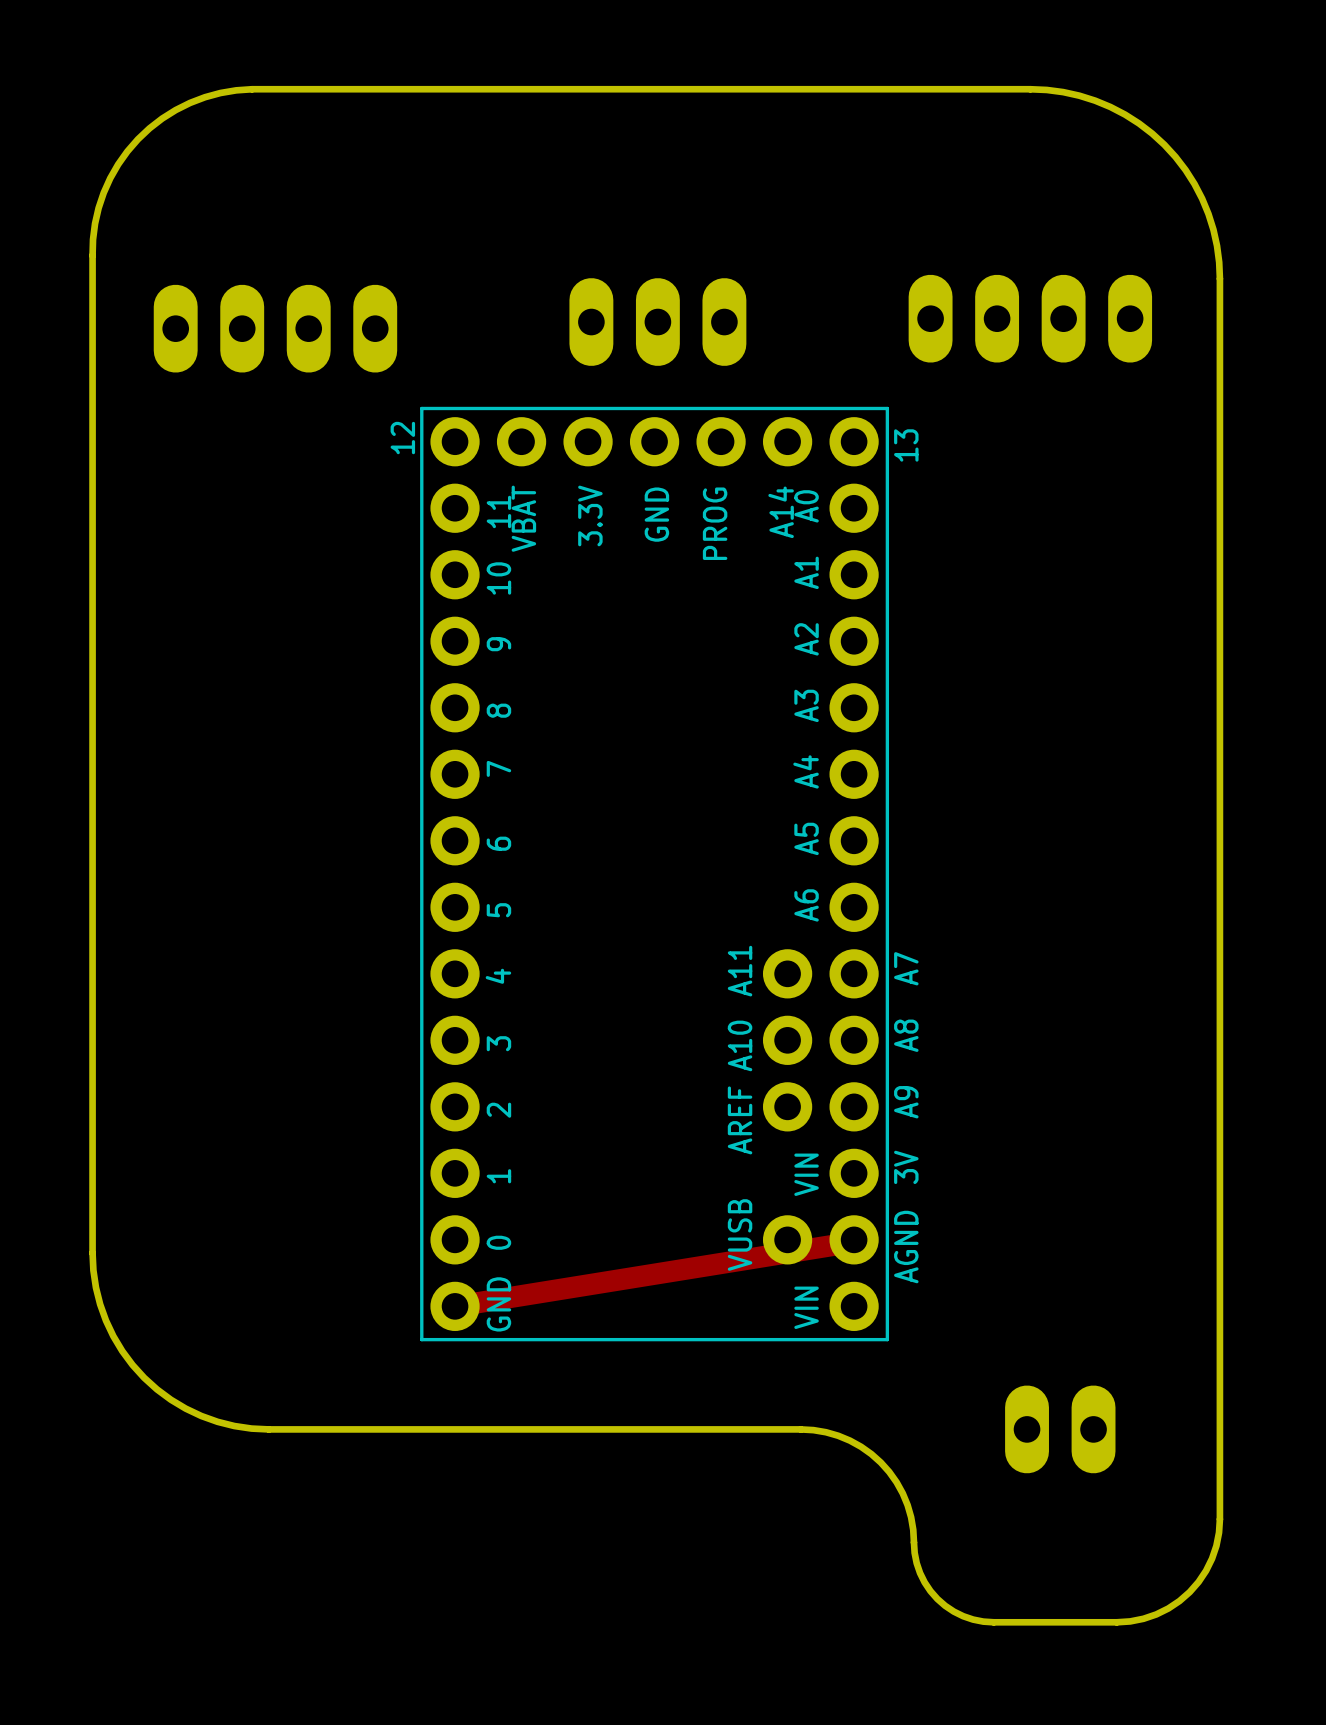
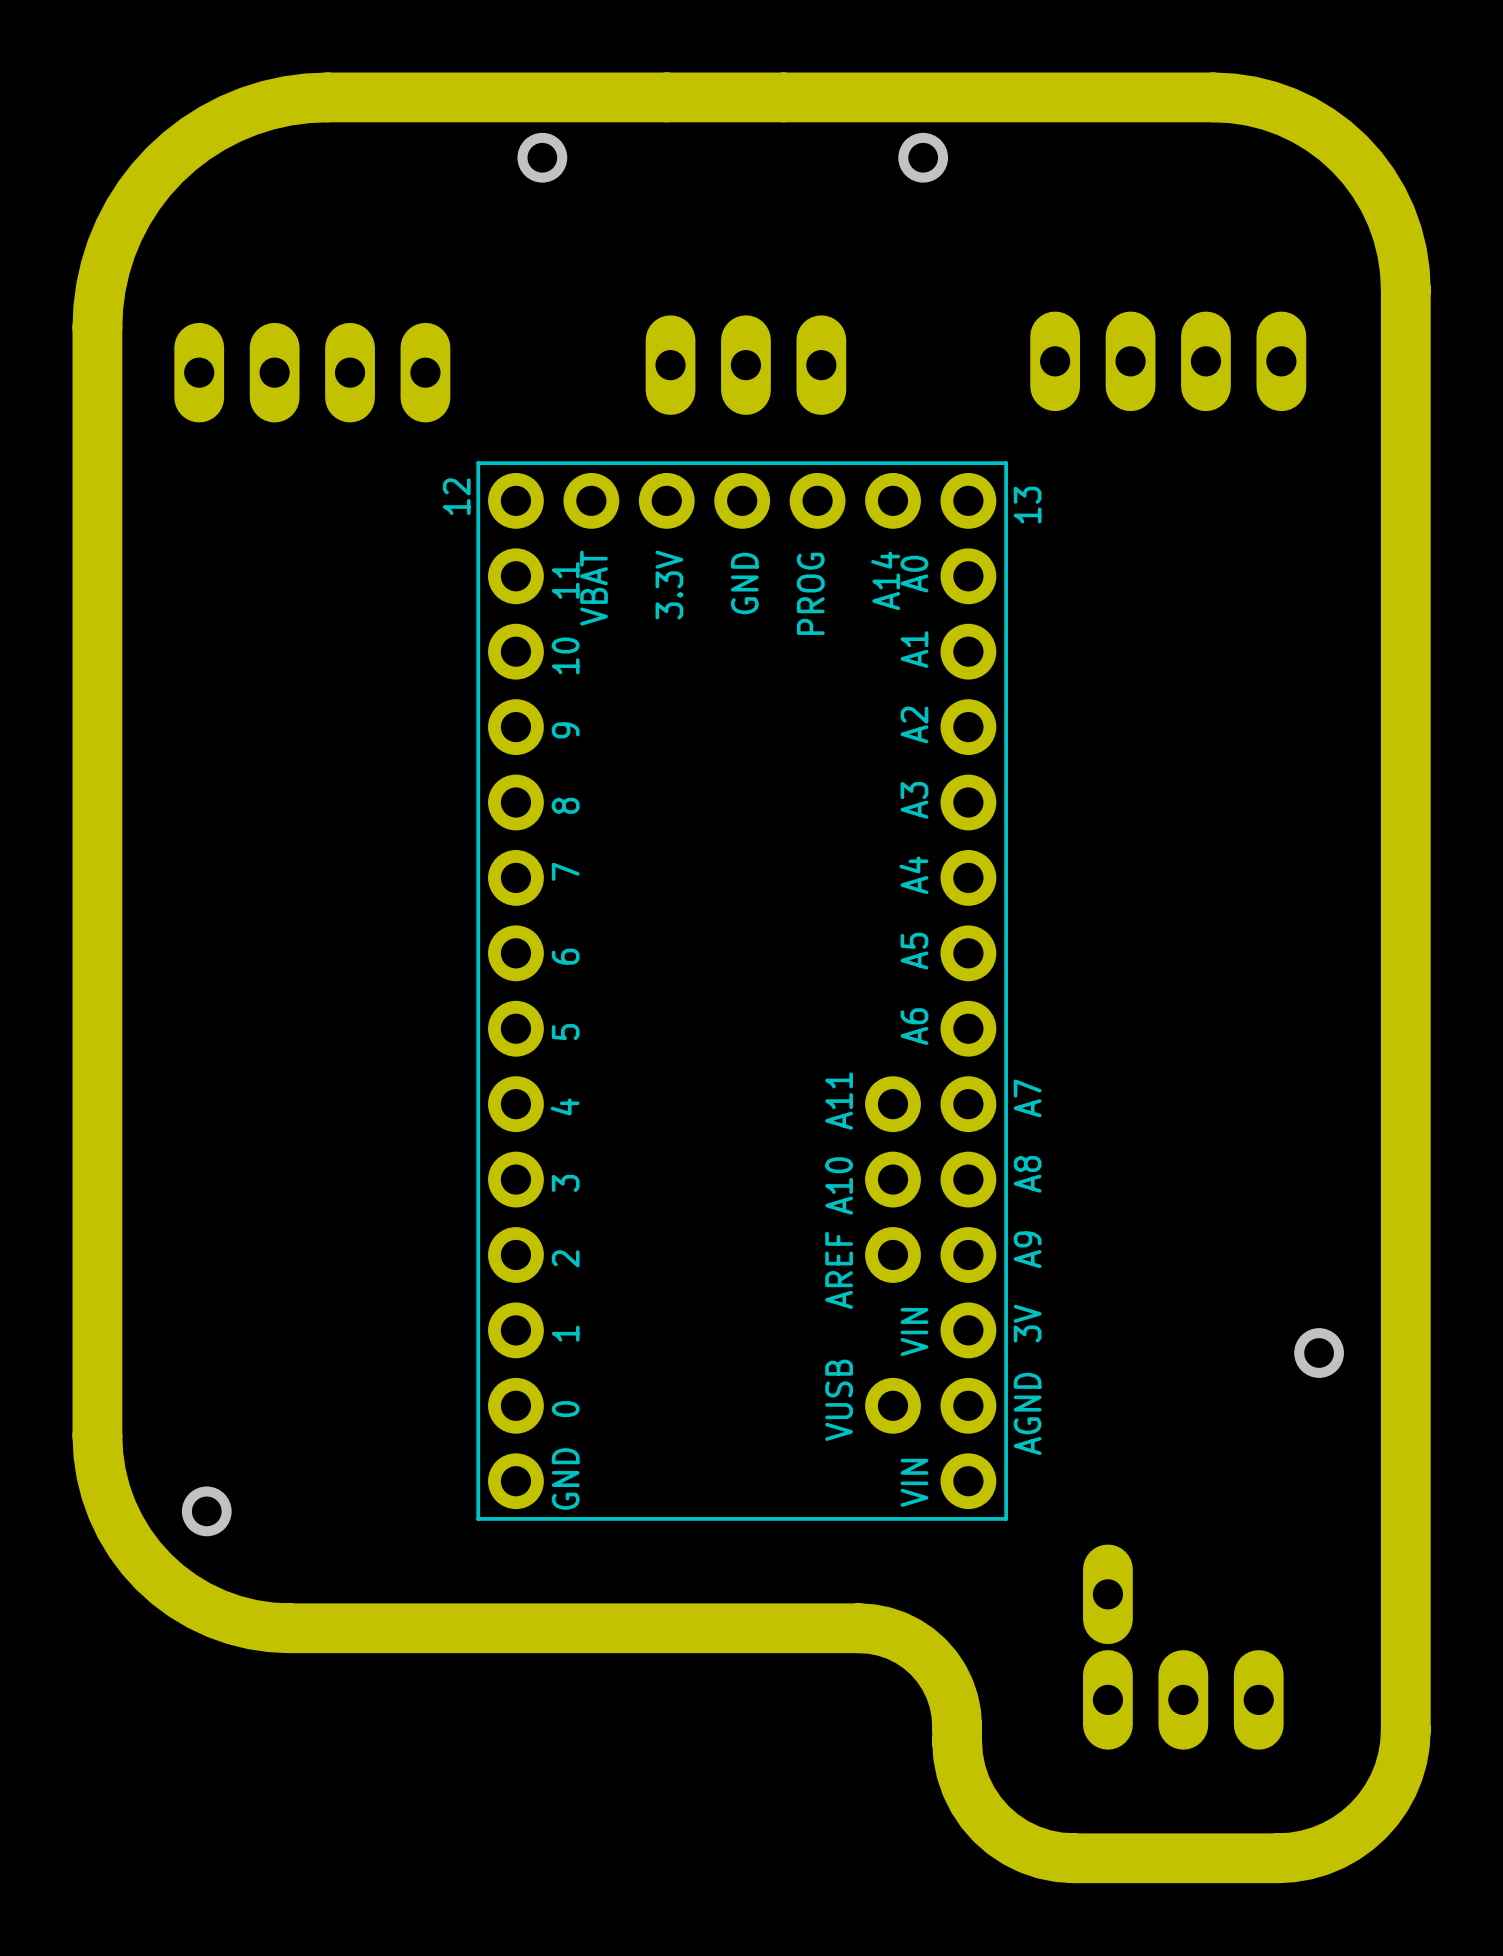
board edge: (252, 89) (1046, 89) (1095, 100) (1125, 114) (1164, 144) (1194, 184) (1213, 229) (1219, 278) (1219, 1519) (1216, 1545) (1206, 1570) (1189, 1592) (1168, 1608) (1143, 1618) (1116, 1622) (983, 1621) (953, 1611) (937, 1598) (920, 1573) (914, 1552) (913, 1529) (907, 1505) (889, 1471) (861, 1446) (826, 1432) (800, 1429) (251, 1428) (217, 1421) (185, 1408) (157, 1389) (132, 1364) (122, 1351) (113, 1336) (100, 1304) (95, 1287) (92, 1253) (93, 239) (98, 208) (110, 178) (127, 151) (149, 128) (175, 110) (205, 97) (220, 93) (252, 89) -> (327, 97) (287, 100) (248, 111) (212, 128) (179, 151) (151, 179) (128, 212) (111, 248) (100, 287) (97, 327) (97, 1435) (98, 1454) (105, 1491) (120, 1526) (141, 1557) (167, 1584) (182, 1595) (216, 1613) (233, 1619) (270, 1627) (859, 1628) (871, 1629) (896, 1635) (918, 1648) (928, 1656) (936, 1666) (949, 1688) (956, 1713) (958, 1756) (961, 1771) (966, 1786) (981, 1812) (1002, 1834) (1029, 1849) (1043, 1854) (1073, 1858) (1277, 1858) (1291, 1857) (1319, 1851) (1345, 1838) (1368, 1820) (1386, 1798) (1398, 1772) (1404, 1744) (1405, 1730) (1405, 289) (1404, 270) (1397, 233) (1383, 199) (1362, 167) (1335, 141) (1320, 129) (1287, 112) (1269, 105) (1232, 98) (327, 97)
via: none -> (542, 157)
via: none -> (923, 157)
via: none -> (1319, 1353)
track: (854, 1239) (867, 1239) (455, 1306) -> none
via: none -> (206, 1511)
part: none -> (1107, 1594)
part: (1060, 1429) -> none
part: none -> (1183, 1699)

